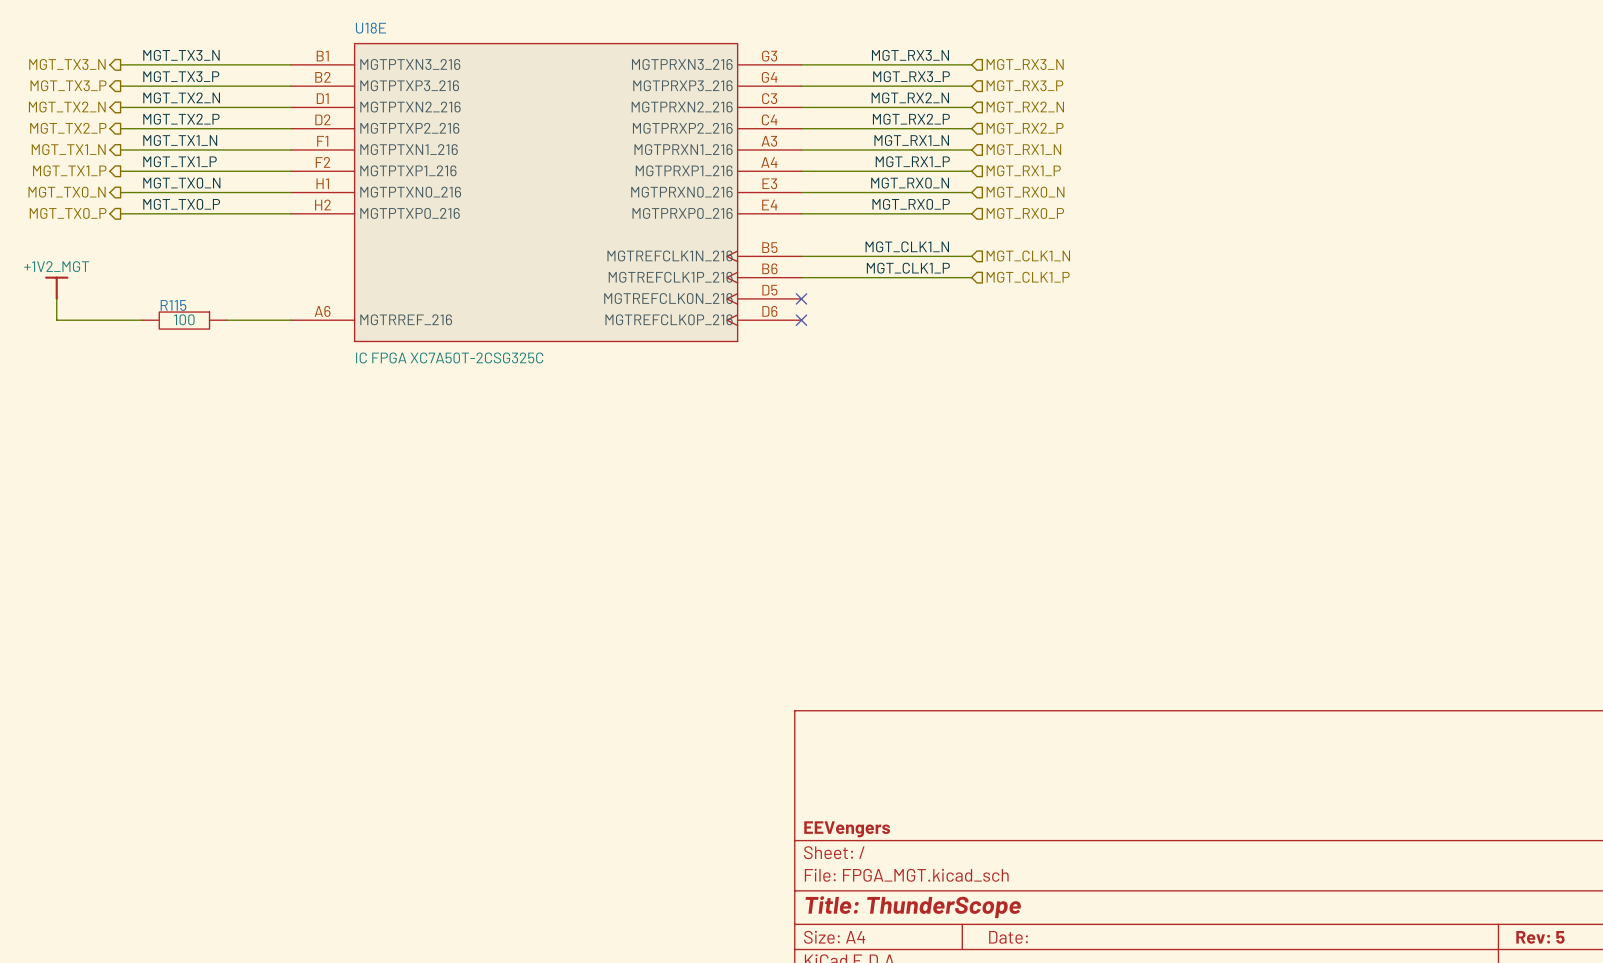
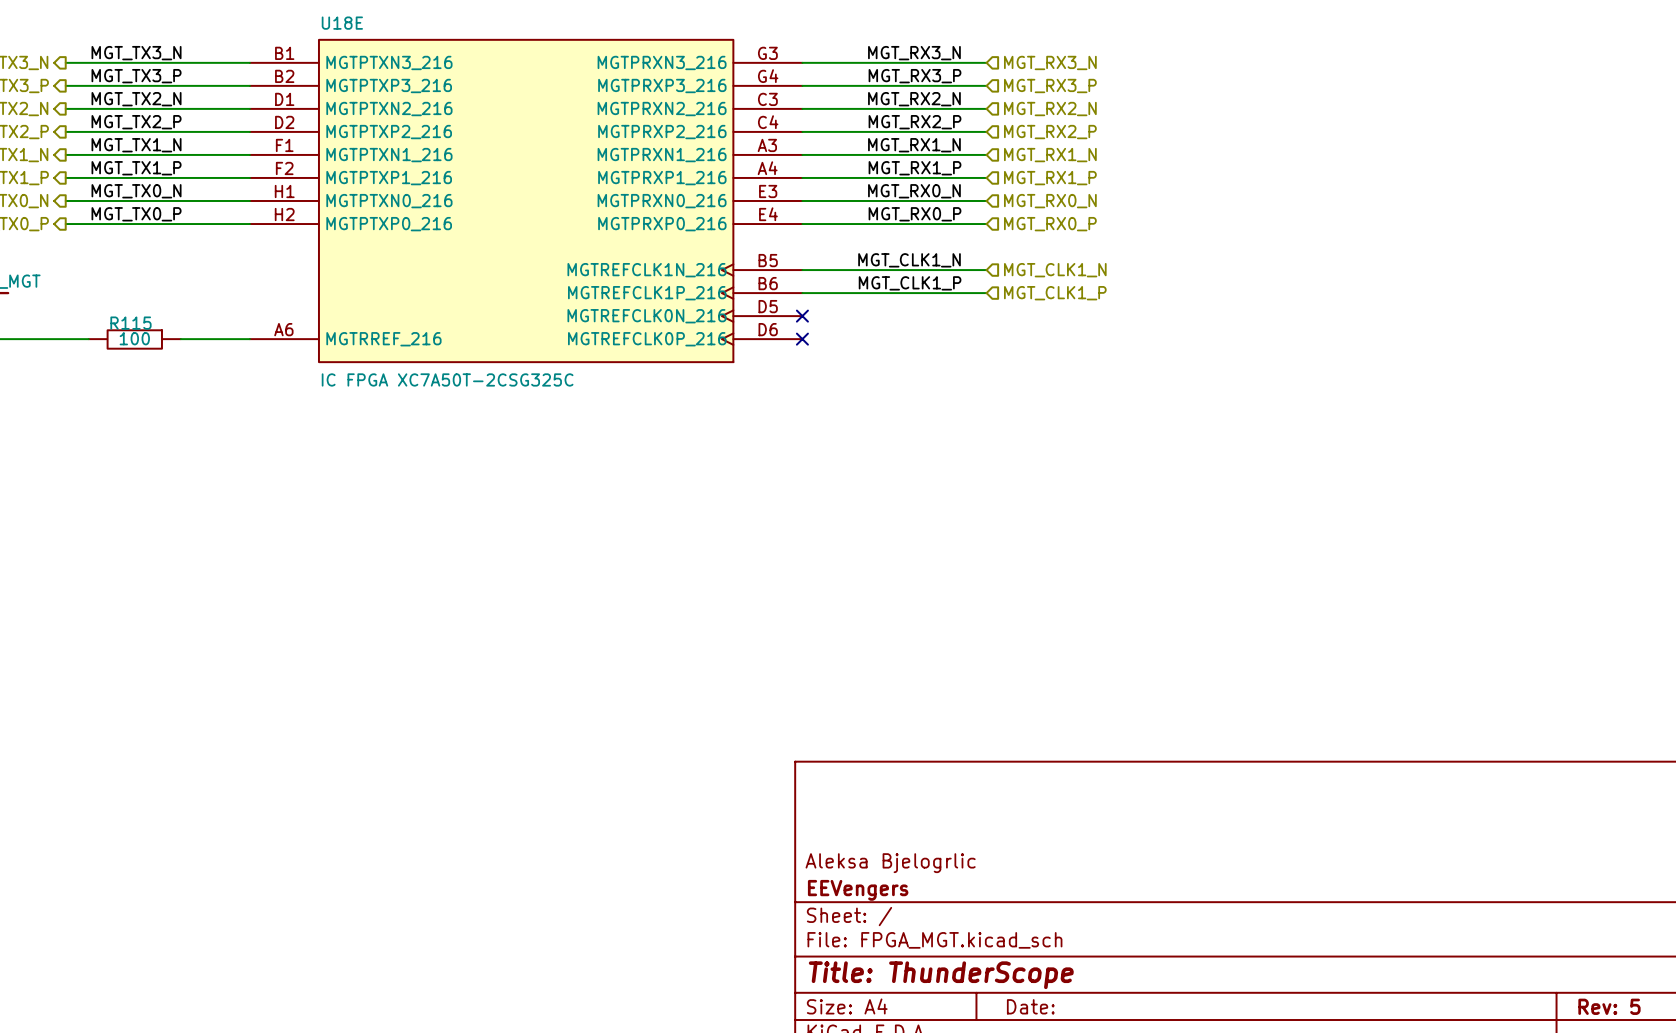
title block: none -> Aleksa Bjelogrlic (890, 863)

